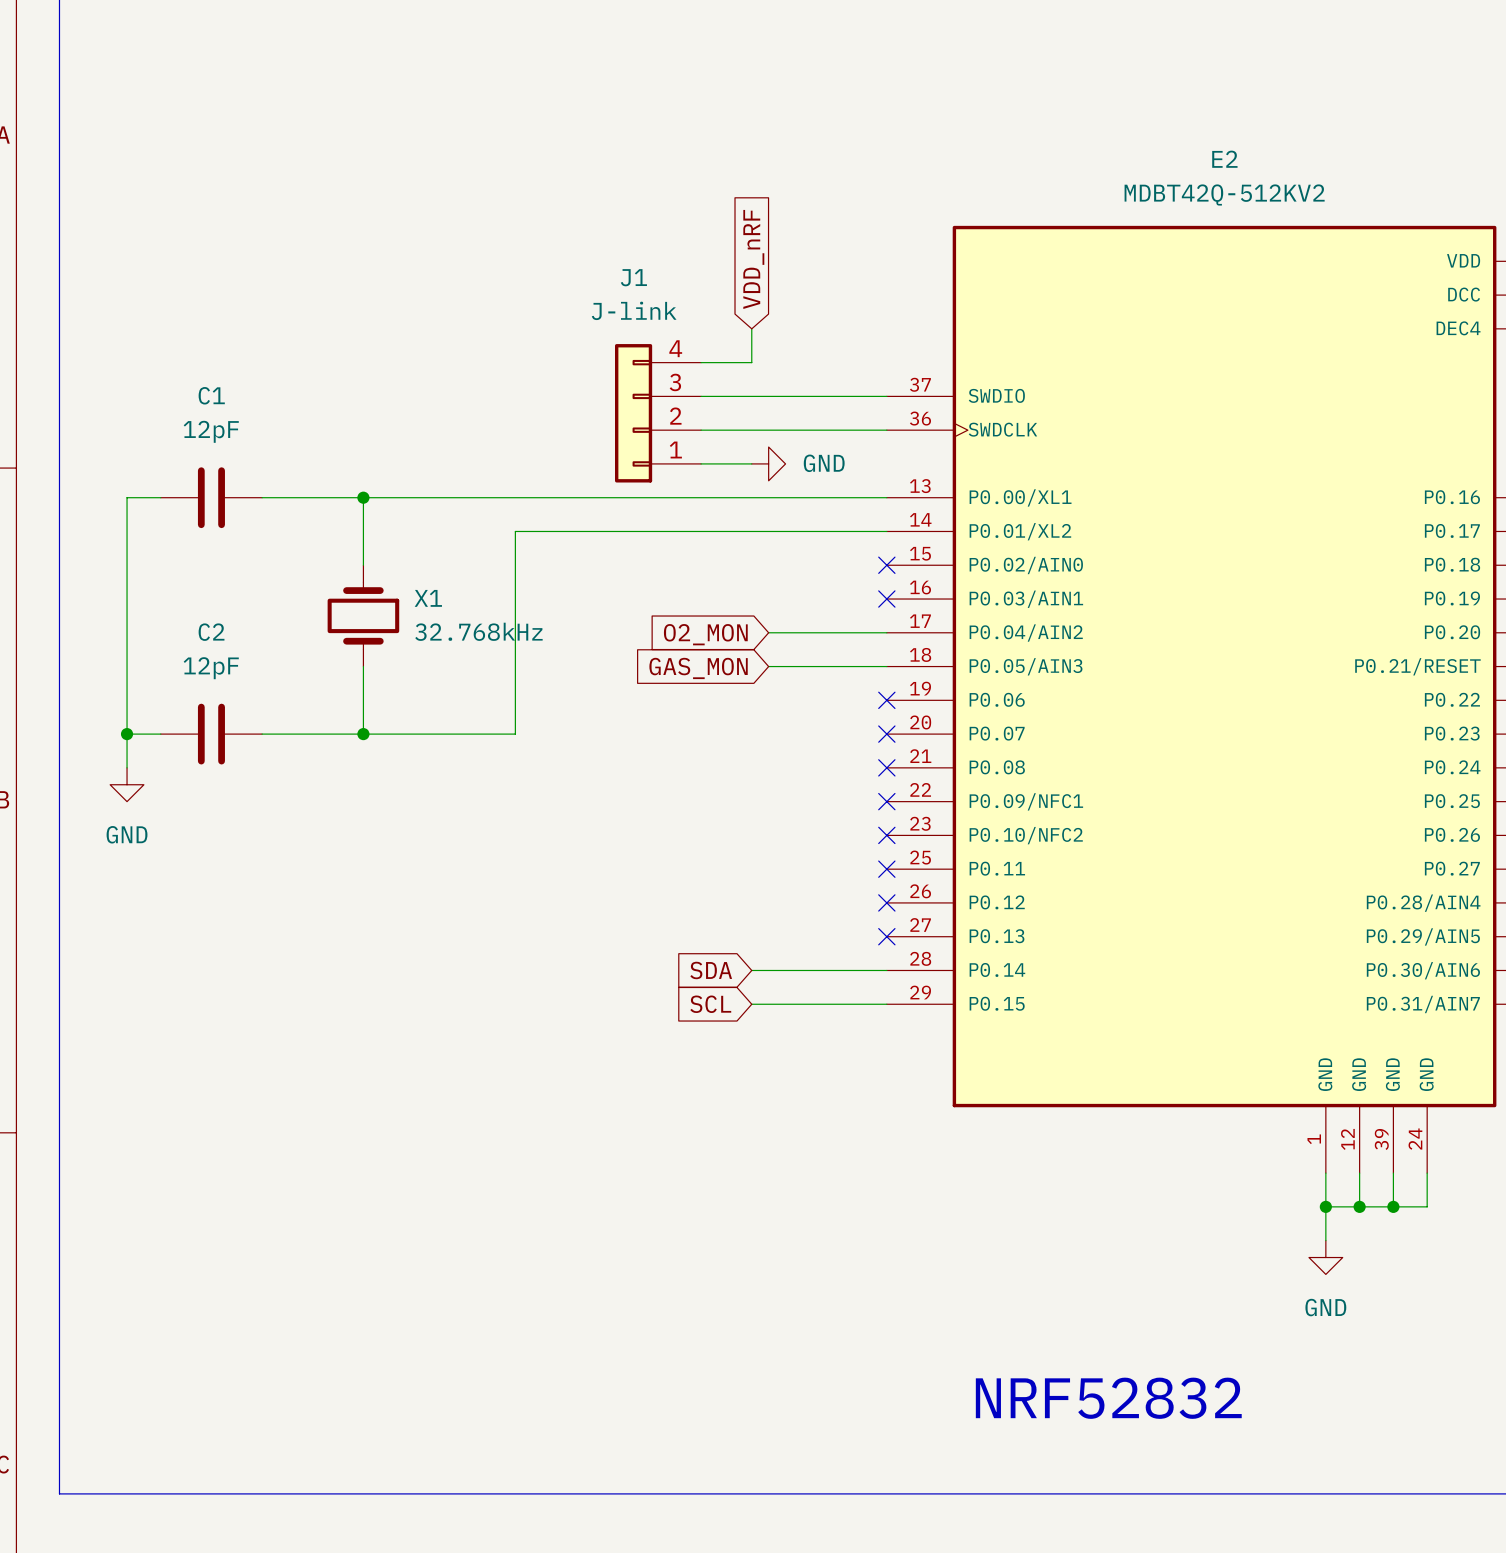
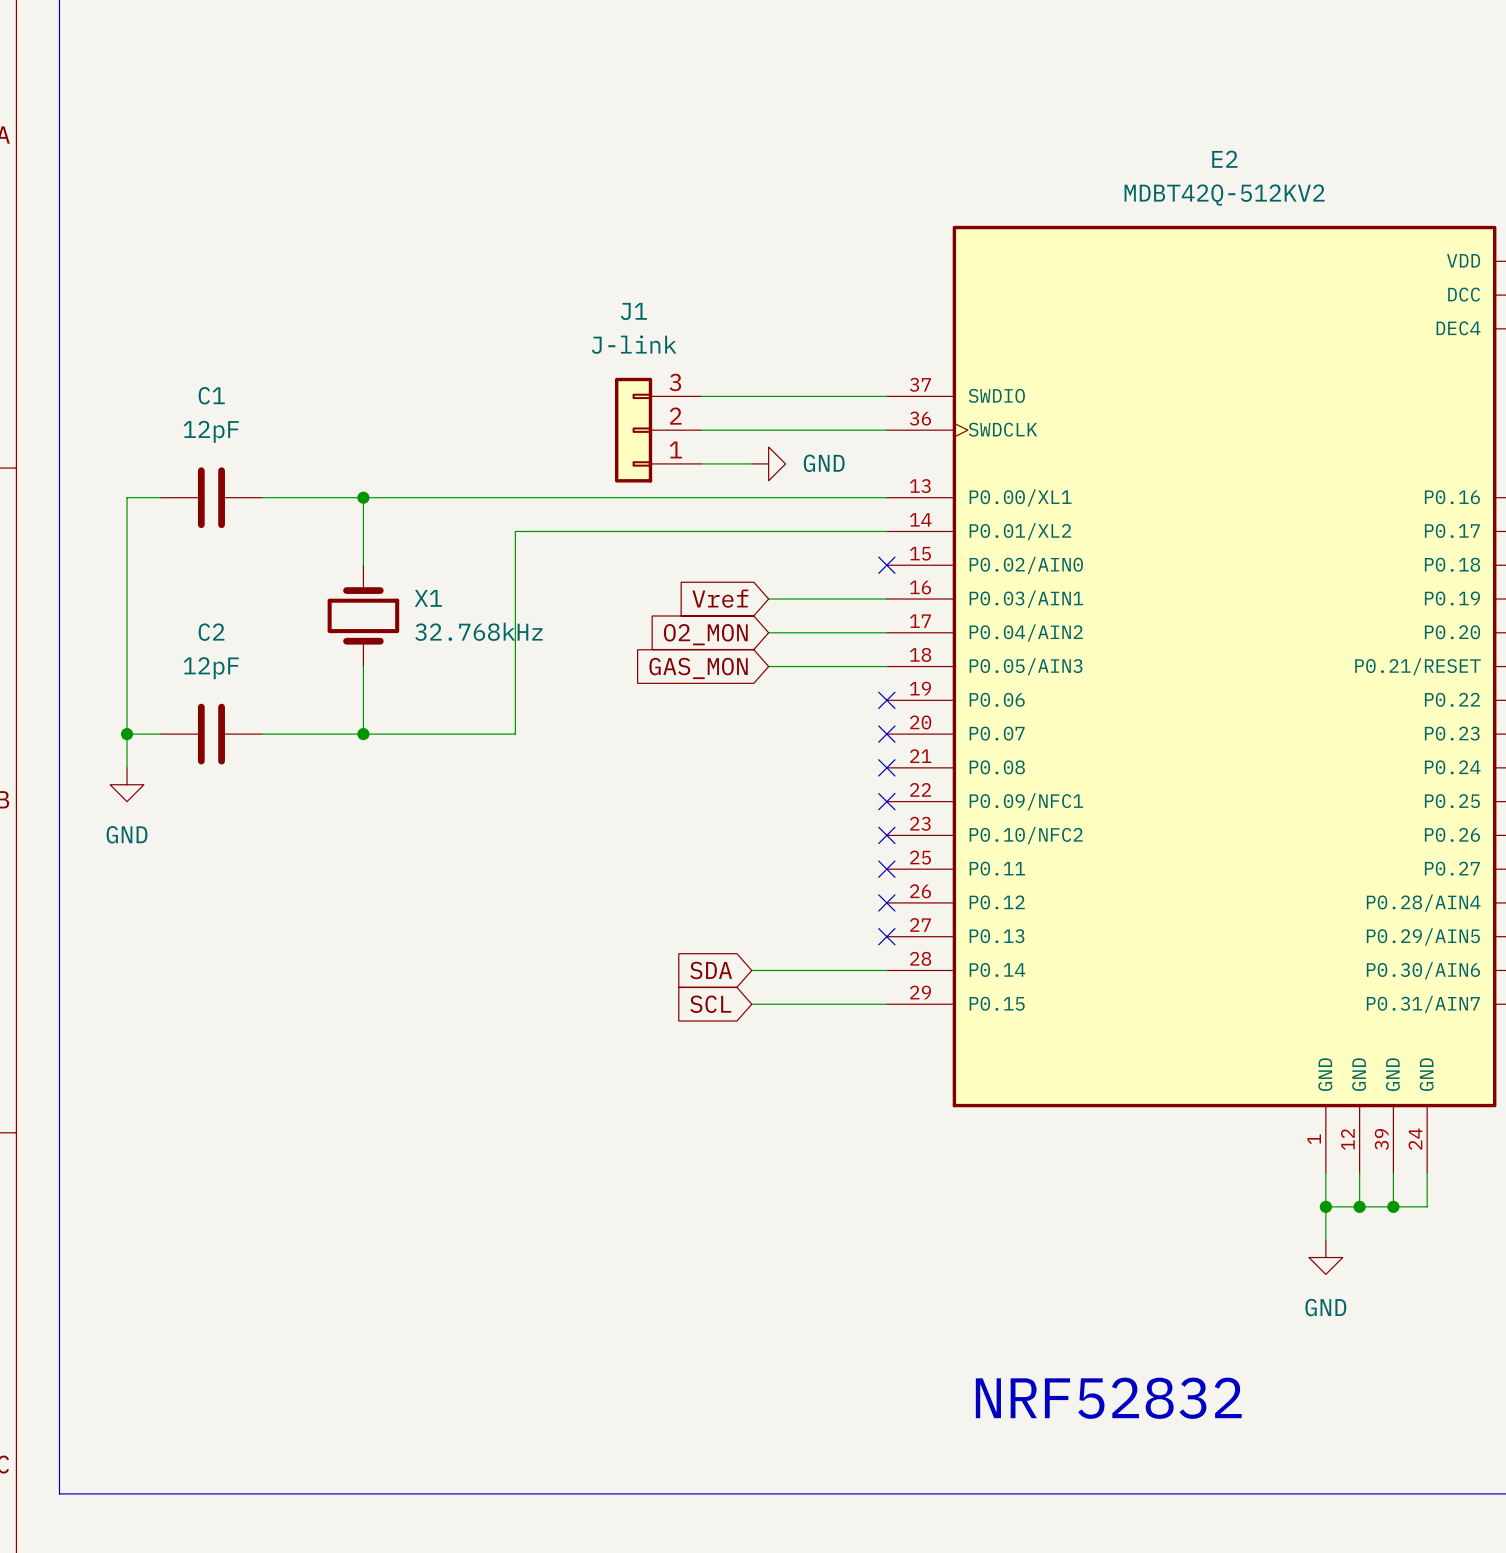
global label: VDD_nRF (753, 259) -> none
wire: (751, 328) (751, 362) (701, 362) -> none
J1 symbol: [615, 344, 702, 483] -> [615, 377, 702, 483]
global label: none -> Vref (720, 598)
wire: none -> (768, 599) (886, 599)
no-connect mark: (886, 599) -> none

